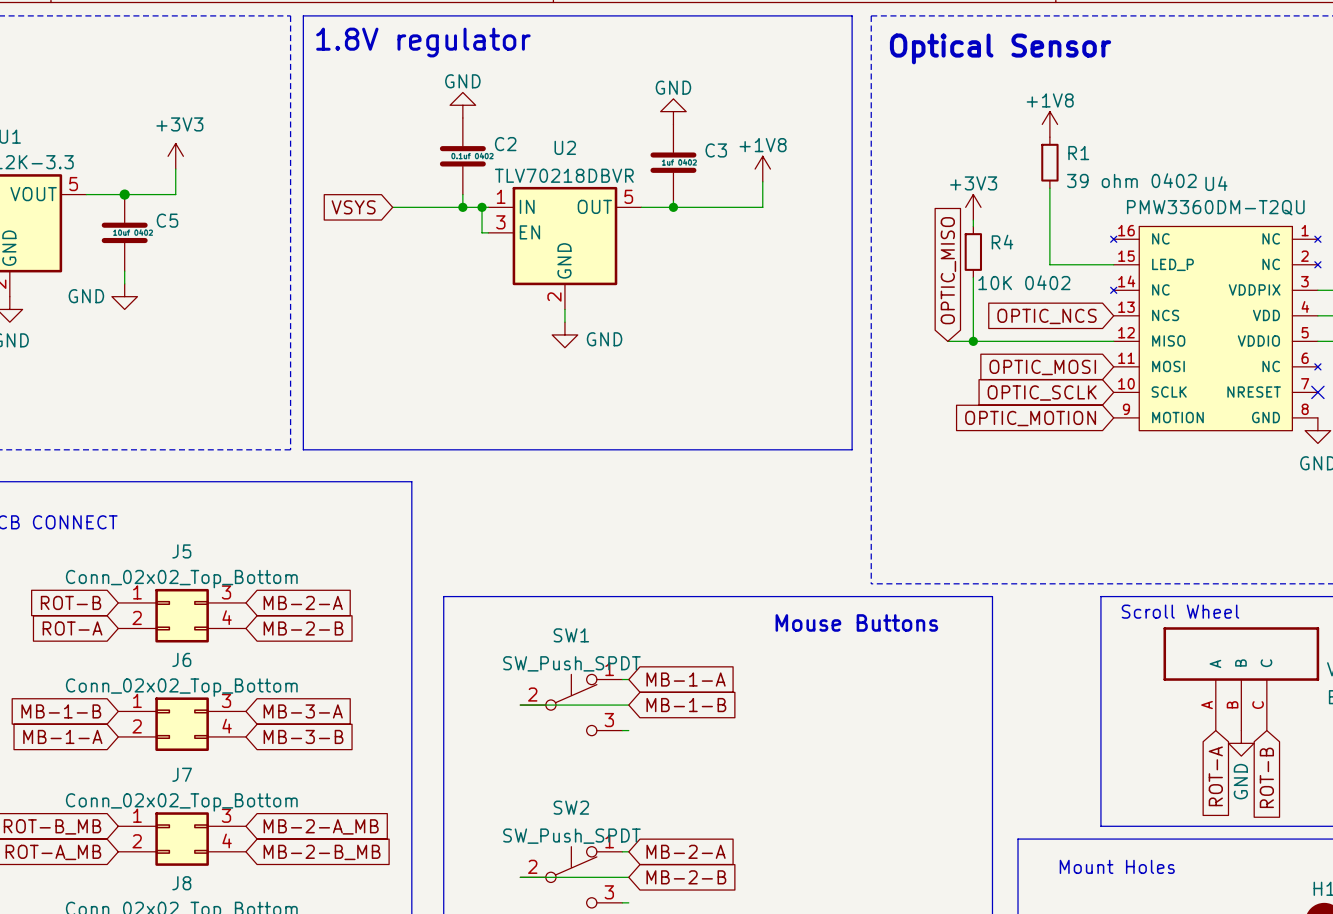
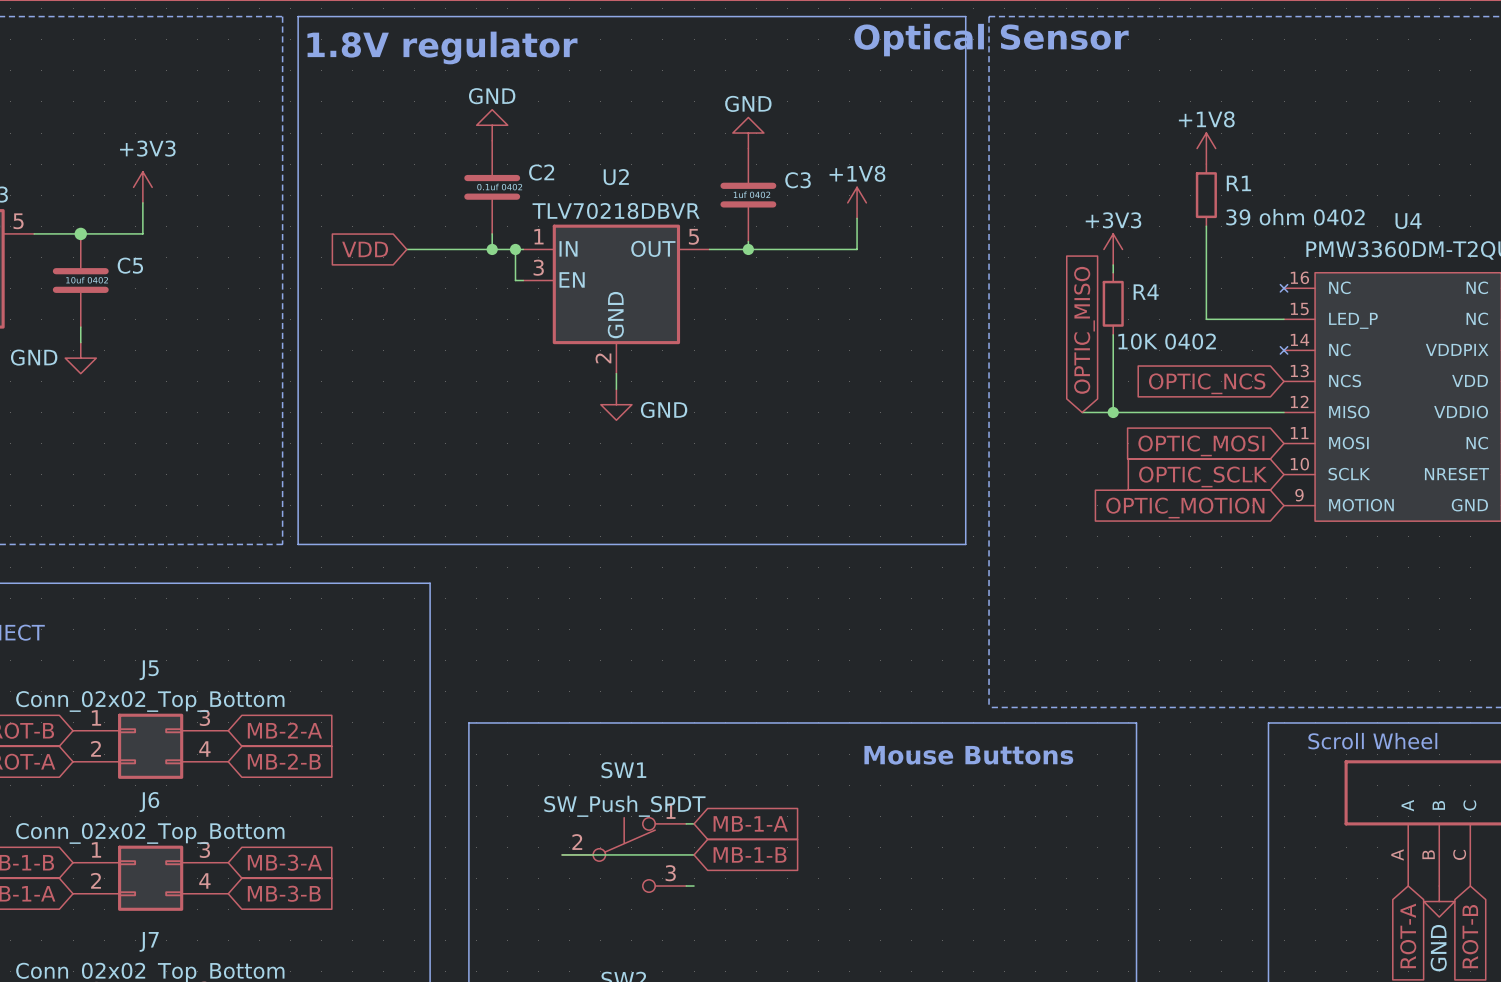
text position: Optical Sensor (1000, 48) -> Optical Sensor (991, 40)
global label: VSYS (353, 207) -> VDD (365, 249)

